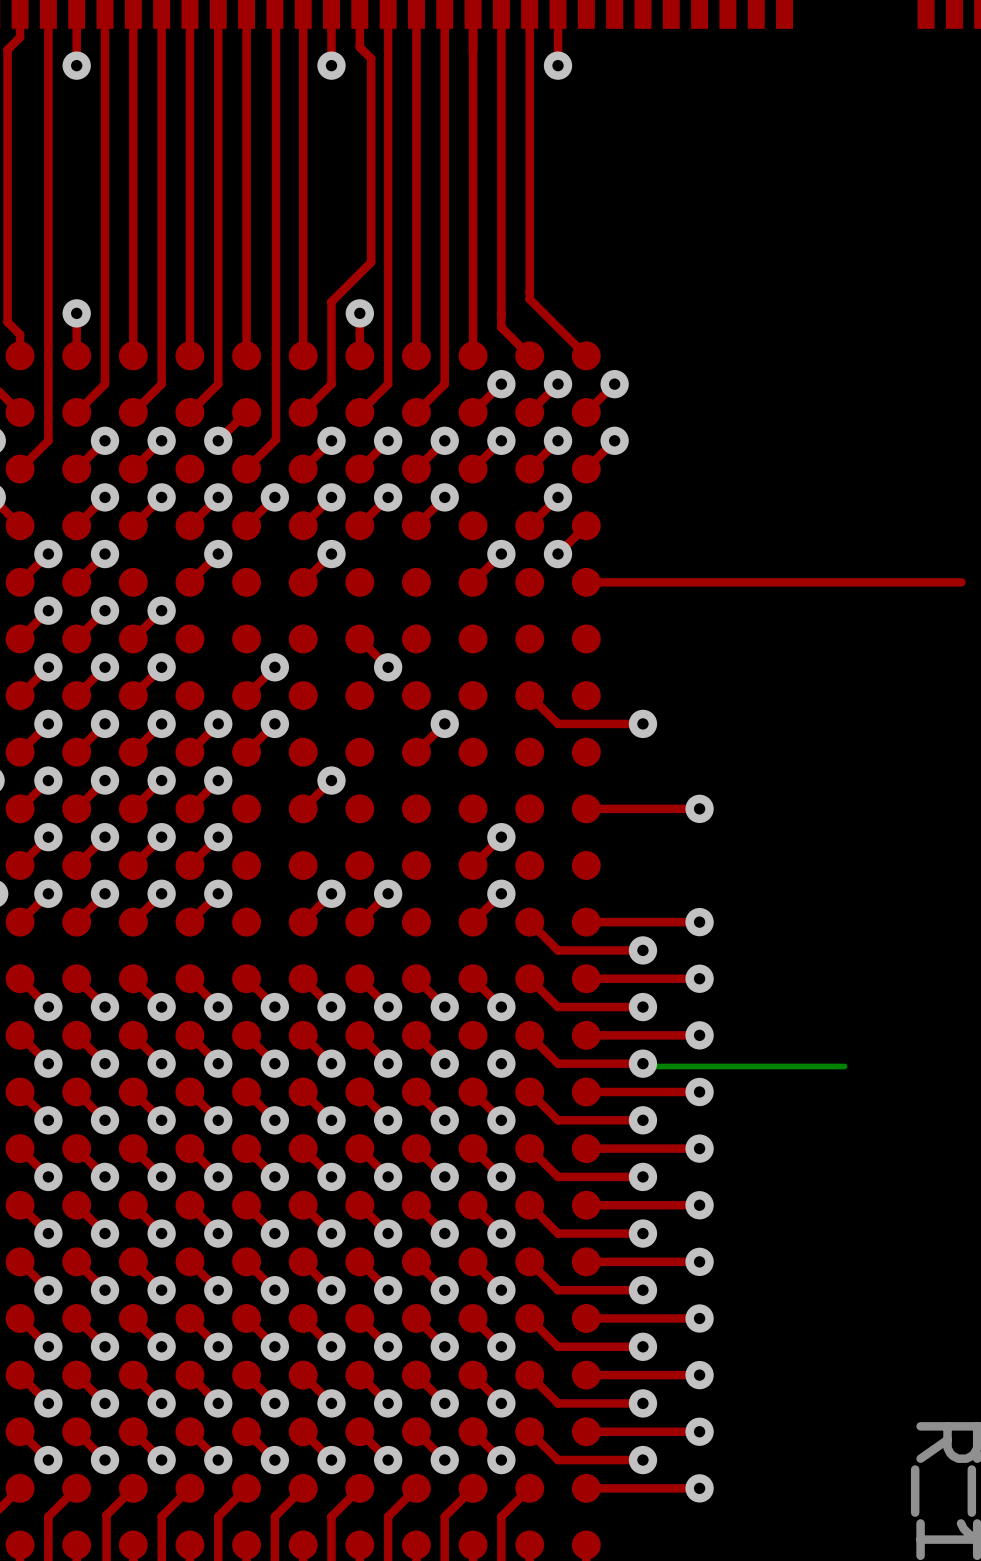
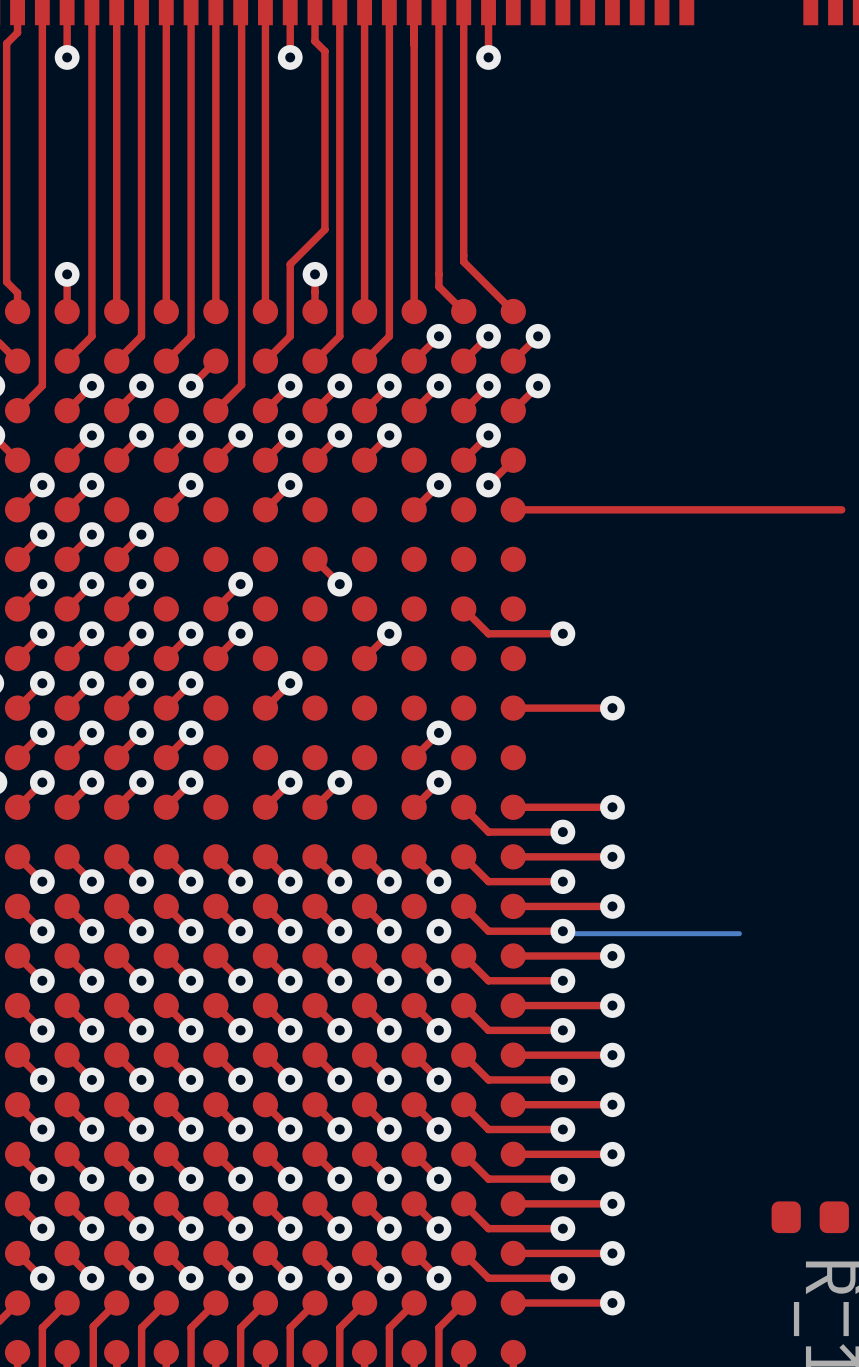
part: none -> (810, 1217)

